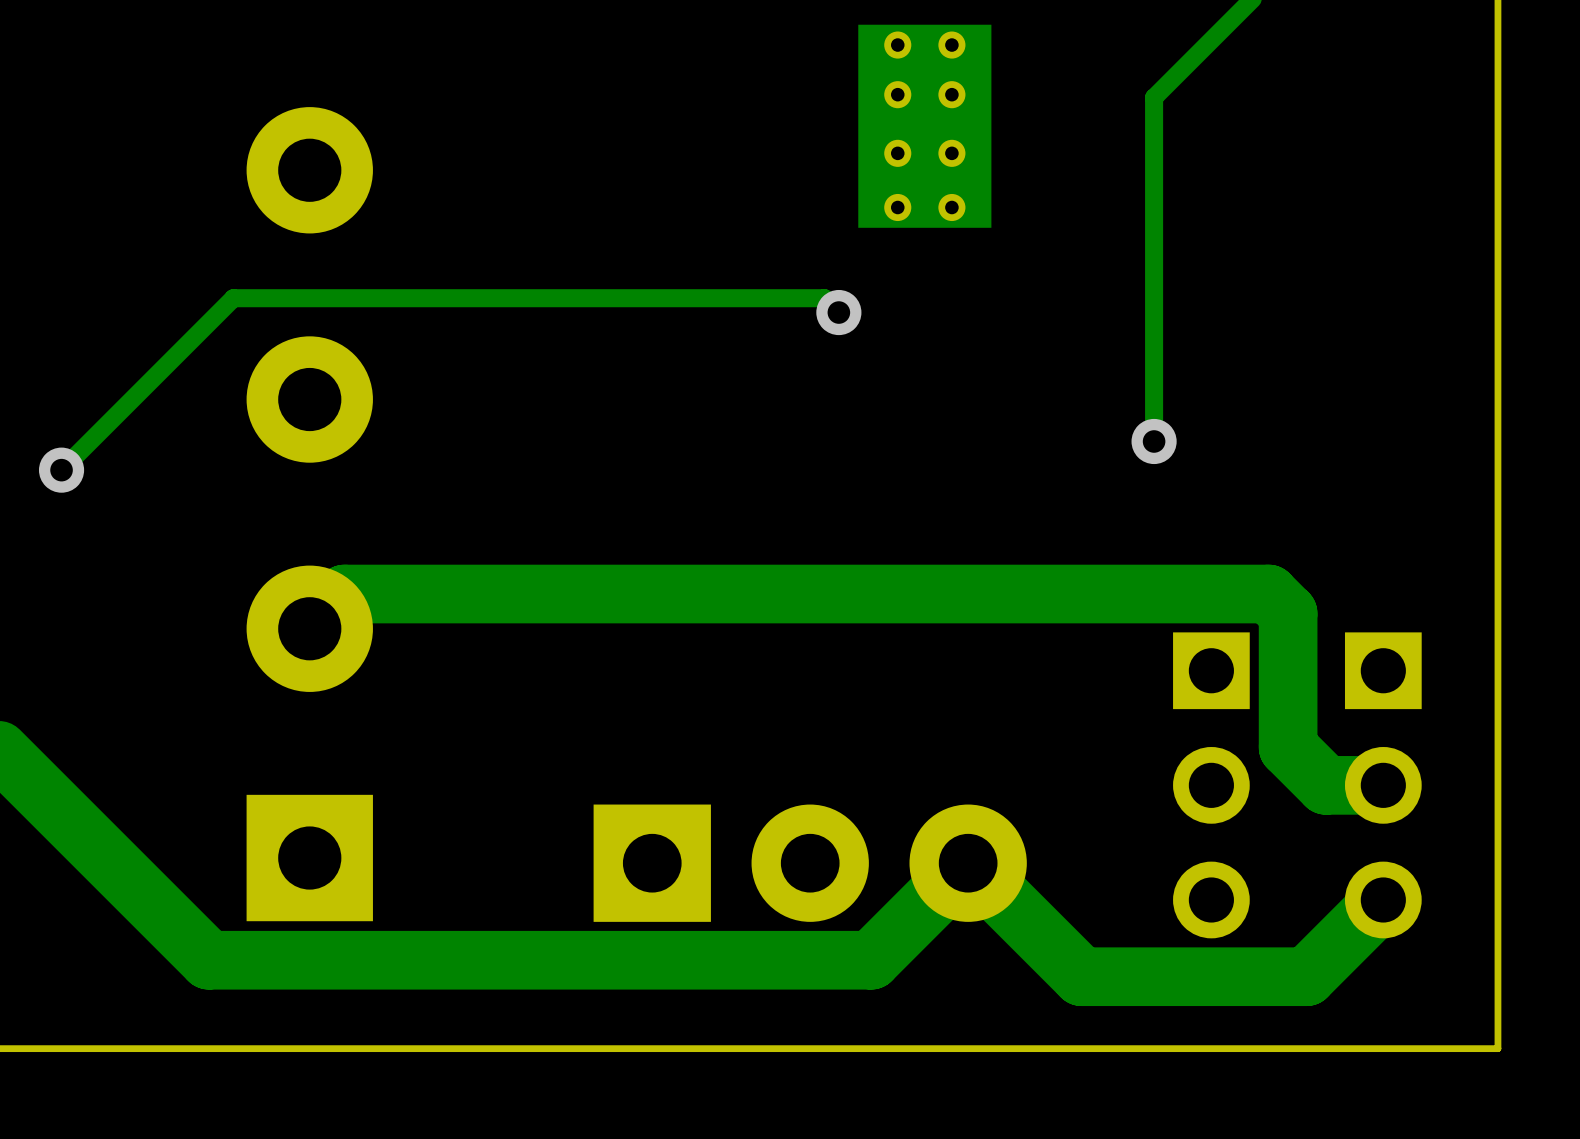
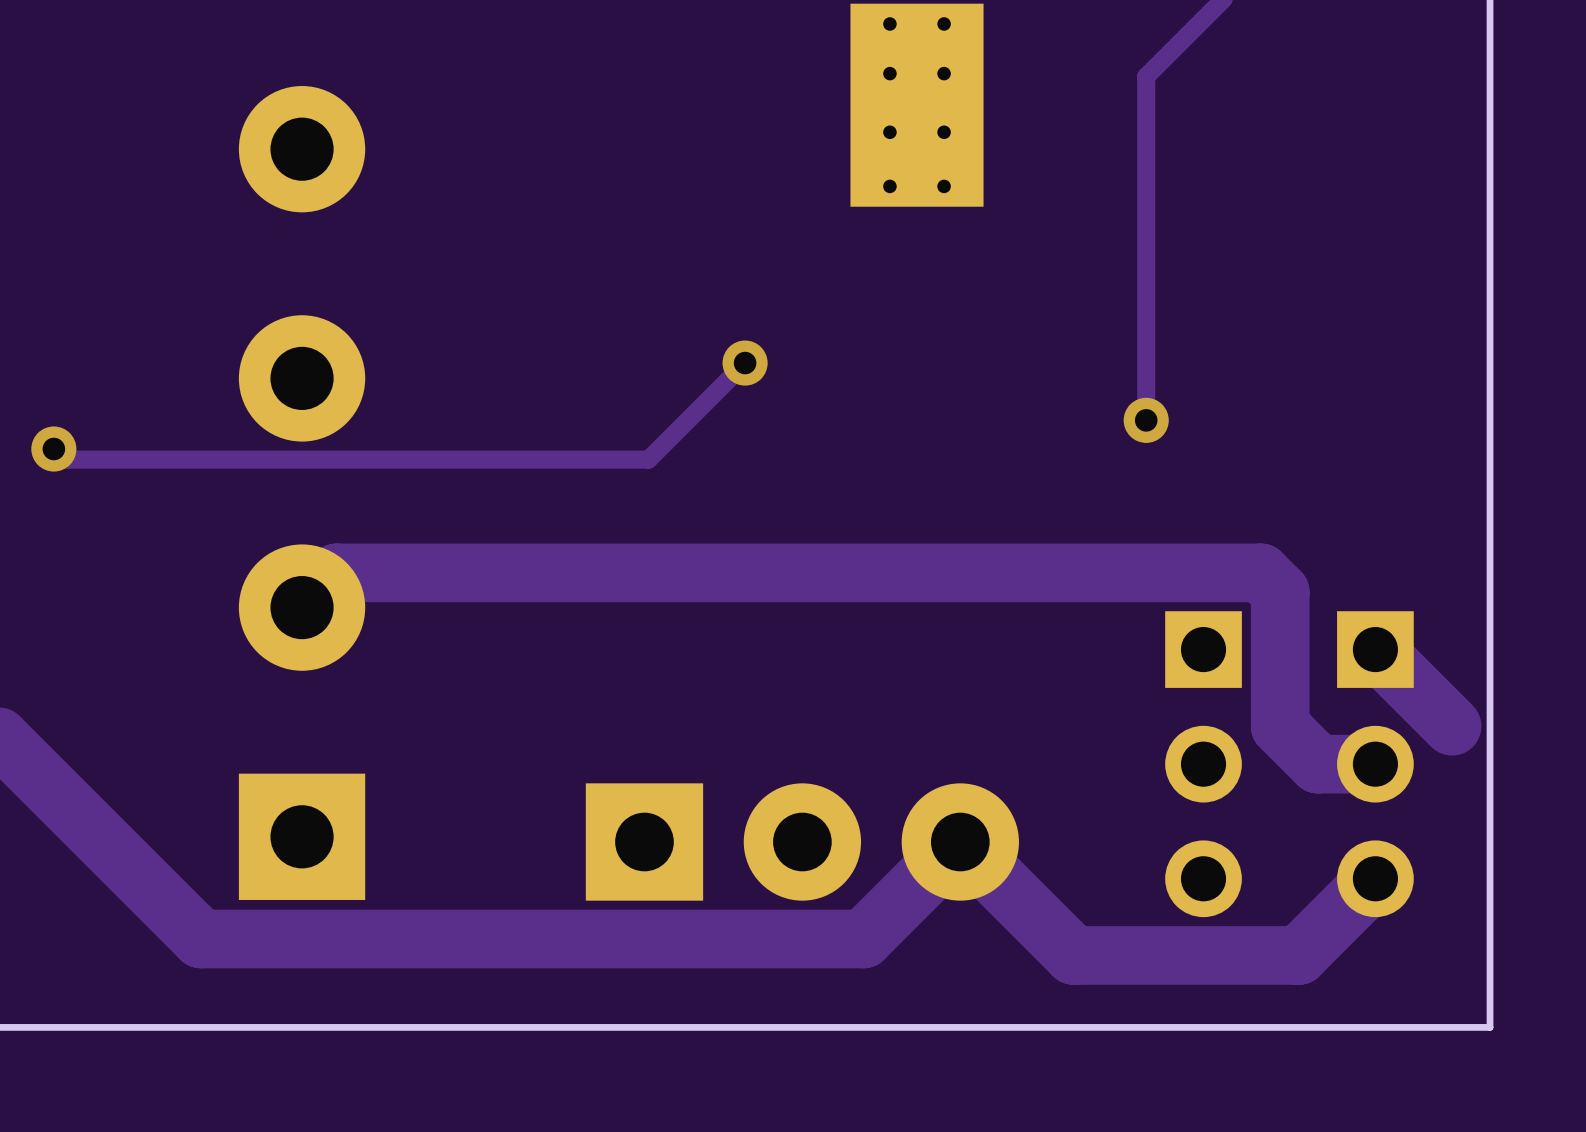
track: (838, 312) (824, 298) (233, 298) (61, 470) -> none
via position: (838, 312) -> (745, 363)
track: none -> (745, 363) (648, 459) (68, 459) (57, 449)
track: none -> (1375, 649) (1452, 726)

